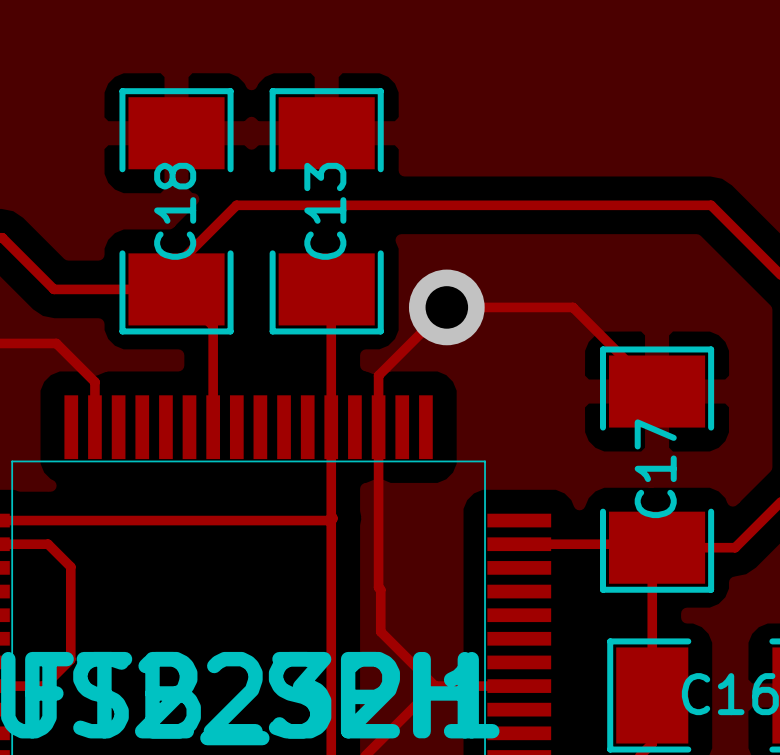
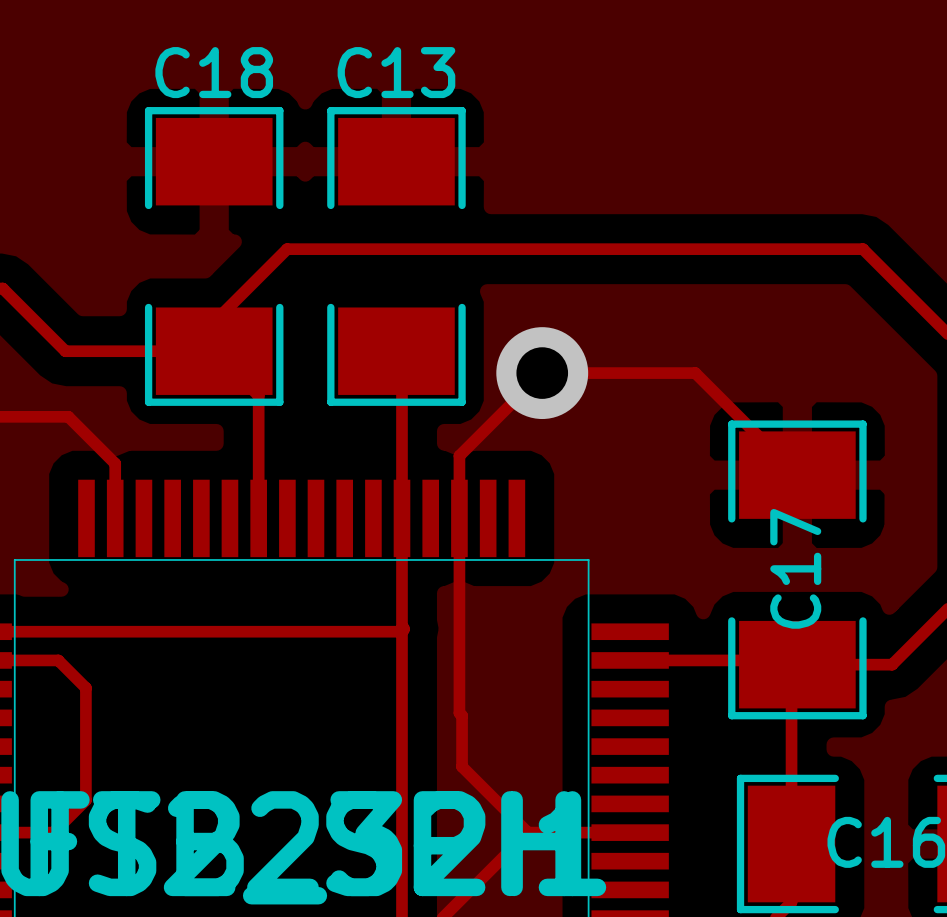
C18 name rotation: 0° (175, 211) -> 90° clockwise (214, 72)
C18 name position: C18 (175, 211) -> C18 (214, 72)
C13 name rotation: 0° (325, 211) -> 90° clockwise (396, 72)
C13 name position: C13 (325, 211) -> C13 (396, 72)

